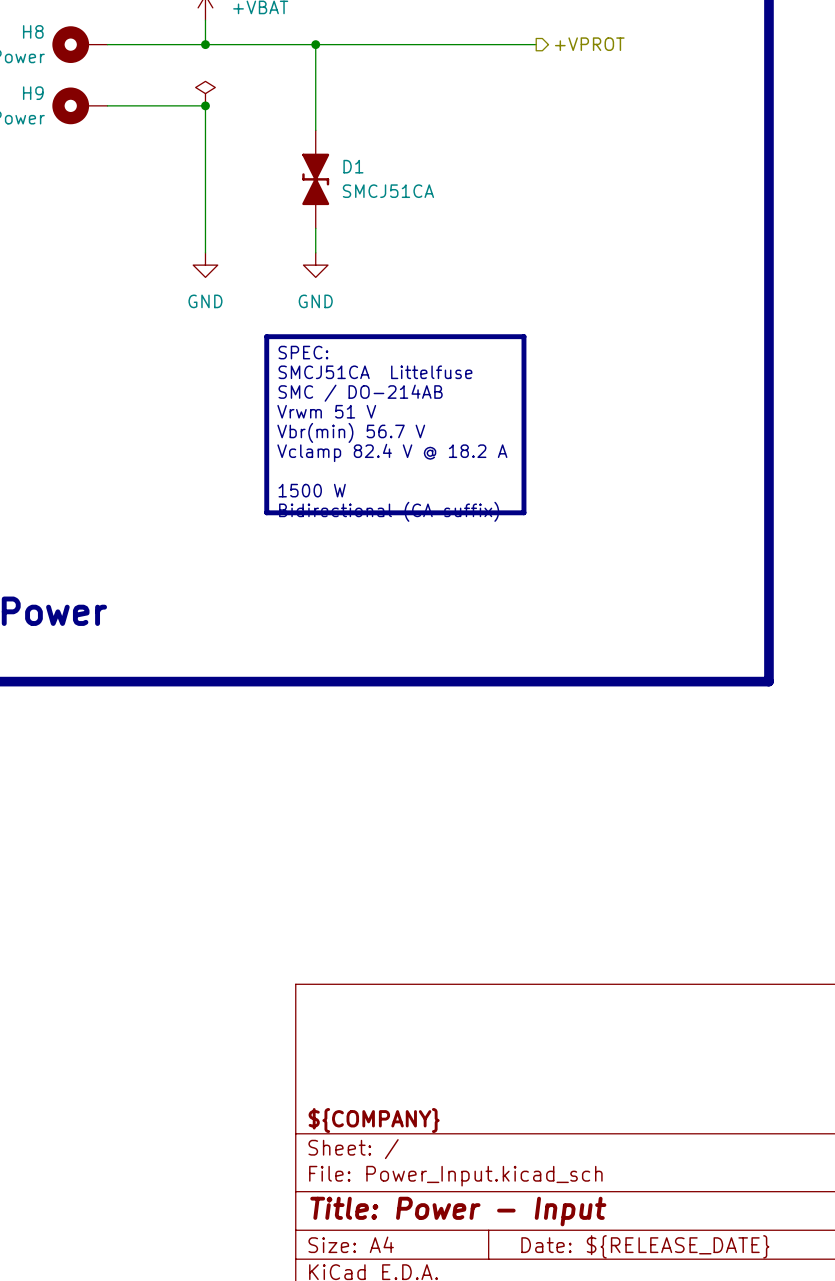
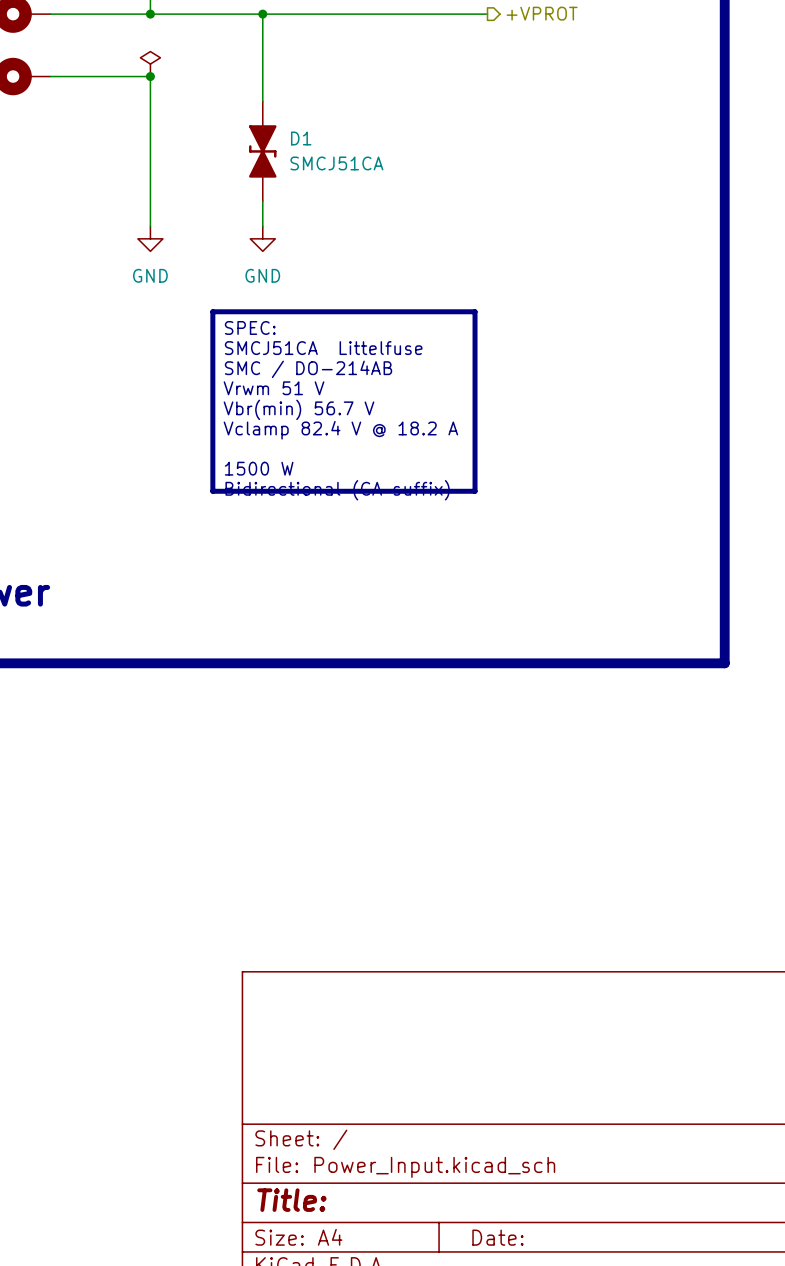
title block: ${COMPANY} (374, 1120) -> none
title block: Title: Power - Input (458, 1211) -> Title: (291, 1200)
title block: Date: ${RELEASE_DATE} (645, 1246) -> Date: (497, 1237)

